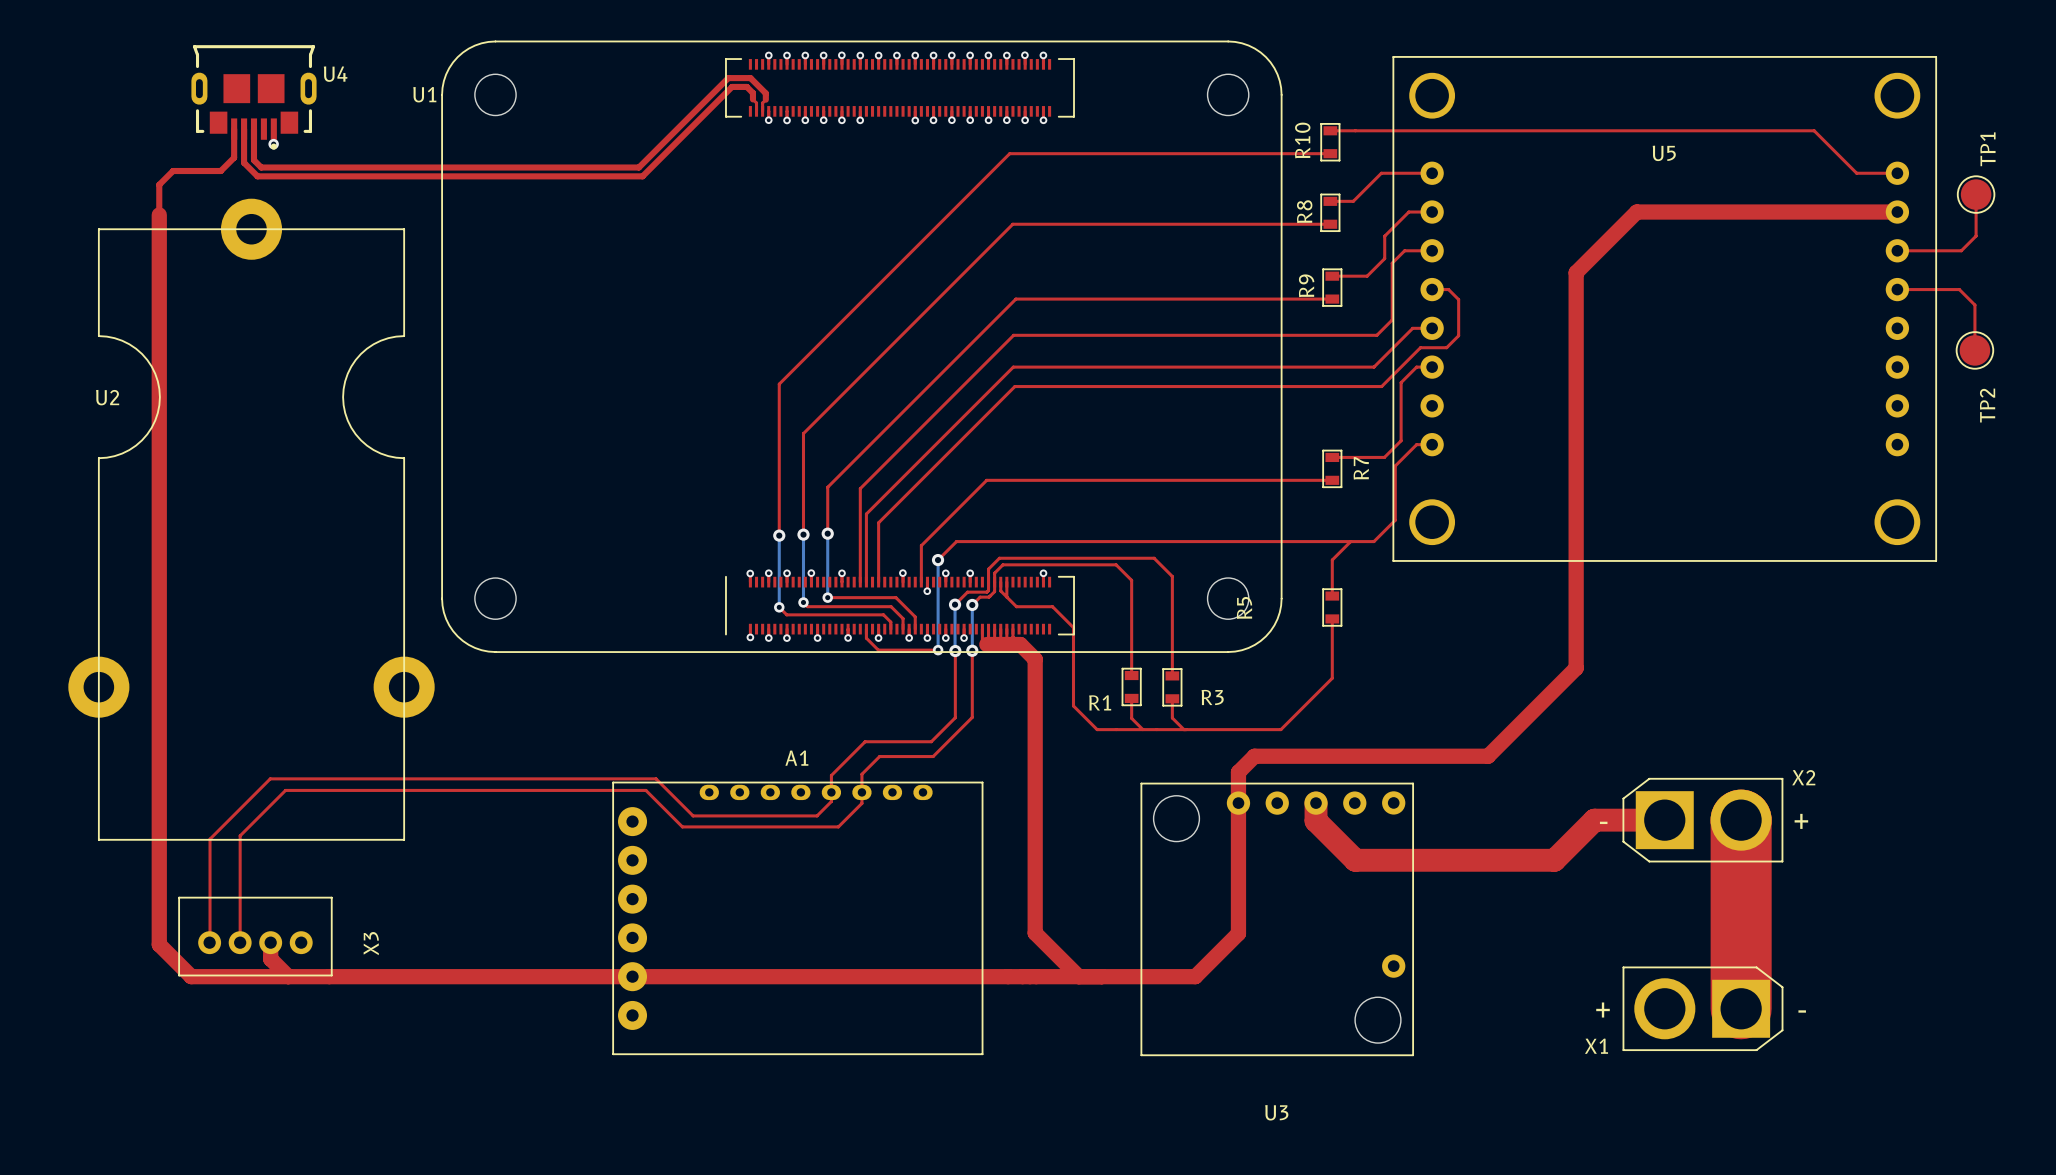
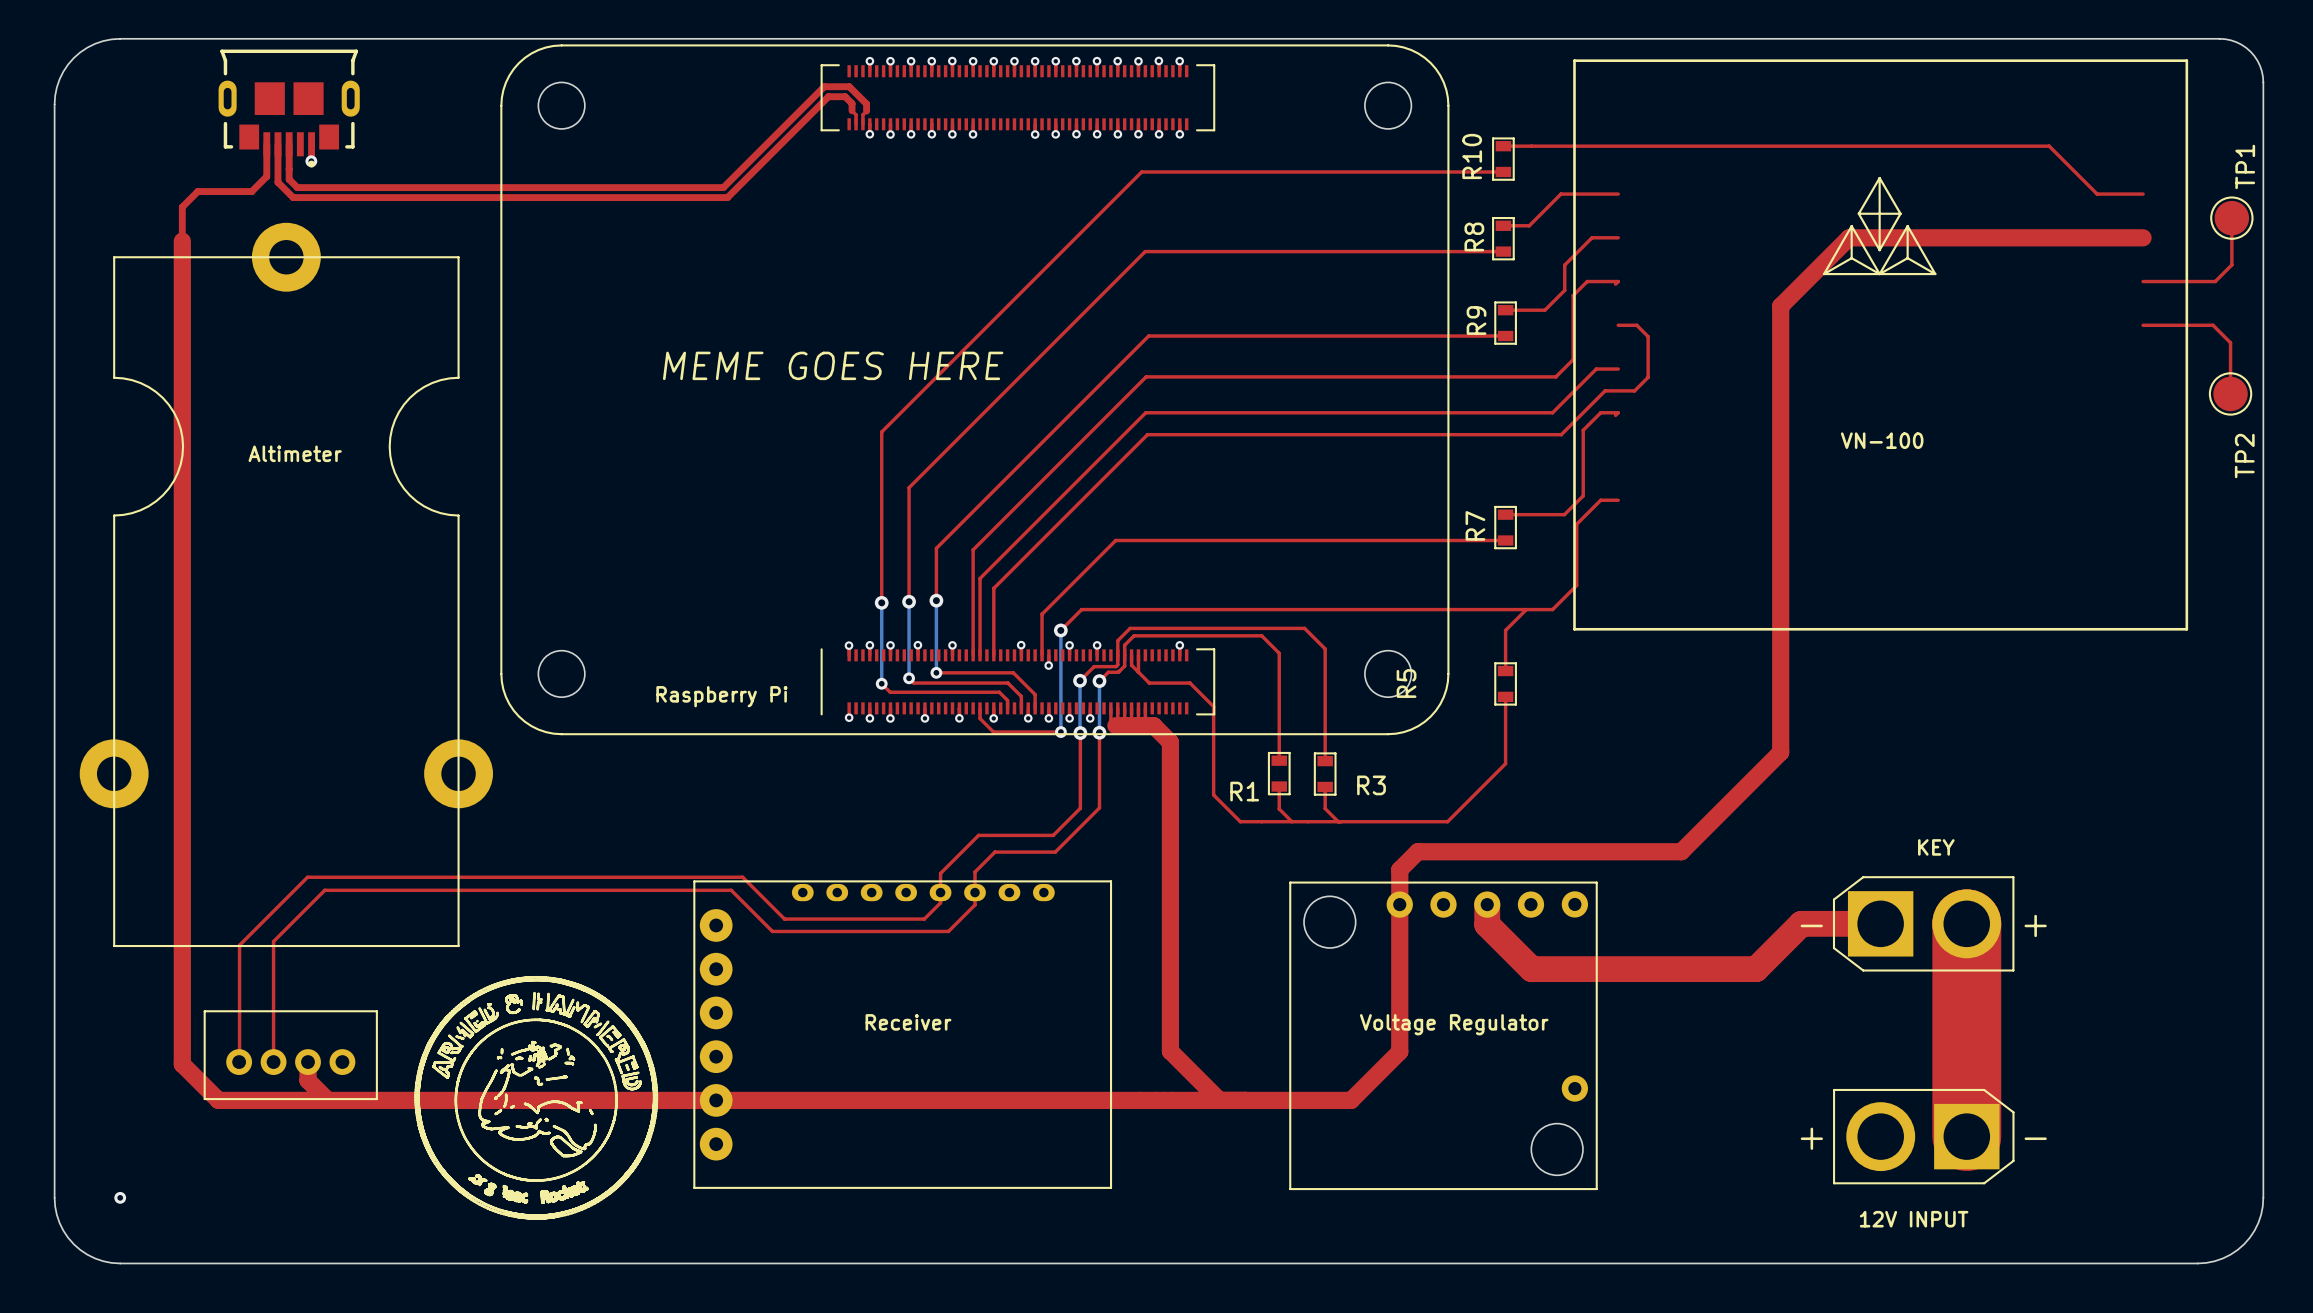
board edge: none -> (120, 38) (2219, 38) (2241, 44) (2257, 60) (2263, 82) (2263, 1197) (2261, 1214) (2254, 1230) (2244, 1244) (2230, 1254) (2214, 1261) (2197, 1263) (120, 1263) (103, 1261) (87, 1254) (73, 1244) (63, 1230) (56, 1214) (54, 1197) (54, 104) (59, 79) (73, 58) (95, 43) (120, 38)
line: none -> (1574, 60) (2186, 60) (2186, 629) (1574, 629) (1574, 60)
U4 name: U4 (335, 74) -> none
U1 name: U1 (424, 94) -> none
line: none -> (1879, 178) (1858, 213)
line: none -> (1879, 178) (1900, 213)
line: none -> (1879, 178) (1879, 250)
line: none -> (1858, 213) (1879, 250)
line: none -> (1858, 213) (1900, 213)
line: none -> (1900, 213) (1879, 250)
line: none -> (1851, 226) (1879, 274)
line: none -> (1851, 226) (1824, 274)
line: none -> (1851, 226) (1851, 258)
line: none -> (1907, 226) (1879, 274)
line: none -> (1907, 226) (1935, 274)
line: none -> (1907, 226) (1907, 258)
line: none -> (1851, 258) (1879, 274)
line: none -> (1851, 258) (1824, 274)
line: none -> (1907, 258) (1935, 274)
line: none -> (1907, 258) (1879, 274)
line: none -> (1824, 274) (1935, 274)
U5: (1664, 308) -> none
text: none -> MEME GOES HERE (833, 365)
text: none -> VN-100 (1882, 440)
U2 name: U2 (107, 397) -> none
text: none -> Altimeter (295, 453)
R7 name position: R7 (1361, 468) -> R7 (1475, 525)
text: none -> Raspberry Pi (721, 696)
text: none -> KEY (1936, 847)
A1 name: A1 (796, 758) -> none
X2 name: X2 (1803, 777) -> none
line: none -> (534, 993) (533, 1009)
line: none -> (538, 993) (538, 998)
line: none -> (548, 993) (547, 1009)
line: none -> (558, 996) (549, 1010)
line: none -> (563, 997) (564, 1013)
line: none -> (573, 999) (566, 1014)
line: none -> (540, 1002) (541, 1002)
line: none -> (577, 1002) (577, 1010)
line: none -> (538, 1002) (537, 1009)
line: none -> (584, 1005) (578, 1010)
line: none -> (574, 1007) (570, 1014)
line: none -> (588, 1007) (581, 1022)
line: none -> (479, 1008) (487, 1023)
line: none -> (490, 1008) (493, 1014)
line: none -> (556, 1008) (559, 1009)
line: none -> (484, 1009) (489, 1017)
line: none -> (550, 1010) (552, 1011)
line: none -> (594, 1011) (584, 1024)
line: none -> (474, 1011) (465, 1018)
line: none -> (475, 1014) (471, 1018)
line: none -> (497, 1014) (495, 1018)
line: none -> (598, 1014) (596, 1022)
line: none -> (594, 1018) (587, 1026)
line: none -> (465, 1018) (475, 1031)
line: none -> (494, 1019) (487, 1023)
line: none -> (532, 1019) (517, 1022) (501, 1027) (476, 1045) (460, 1071) (456, 1086) (455, 1103) (462, 1132) (470, 1145) (481, 1158) (507, 1175) (523, 1179) (539, 1180) (554, 1178) (570, 1172) (595, 1154) (611, 1128) (615, 1113) (616, 1097) (609, 1067) (602, 1054) (591, 1041) (565, 1025) (548, 1020) (532, 1019)
line: none -> (477, 1021) (477, 1021)
line: none -> (608, 1021) (598, 1034)
line: none -> (482, 1022) (477, 1026)
text: none -> Receiver (908, 1022)
line: none -> (460, 1022) (472, 1033)
line: none -> (600, 1023) (594, 1027)
line: none -> (484, 1025) (476, 1031)
text: none -> Voltage Regulator (1454, 1024)
line: none -> (612, 1026) (600, 1037)
line: none -> (613, 1026) (619, 1035)
line: none -> (457, 1027) (460, 1033)
line: none -> (613, 1032) (617, 1036)
line: none -> (449, 1035) (461, 1046)
line: none -> (465, 1036) (462, 1030) (470, 1036)
line: none -> (608, 1036) (612, 1039)
line: none -> (456, 1036) (463, 1038)
line: none -> (600, 1038) (607, 1045)
line: none -> (623, 1039) (609, 1048)
line: none -> (623, 1039) (628, 1046)
line: none -> (534, 1042) (535, 1042)
line: none -> (443, 1044) (439, 1052)
line: none -> (460, 1047) (452, 1048)
line: none -> (460, 1048) (458, 1051)
line: none -> (559, 1047) (557, 1049)
line: none -> (502, 1049) (501, 1053)
line: none -> (567, 1048) (568, 1054)
line: none -> (522, 1050) (512, 1054)
line: none -> (444, 1051) (446, 1052)
line: none -> (457, 1052) (451, 1052)
line: none -> (438, 1052) (453, 1060)
line: none -> (538, 1053) (538, 1054)
line: none -> (620, 1053) (617, 1061)
line: none -> (534, 1055) (533, 1060)
line: none -> (545, 1055) (546, 1059)
line: none -> (555, 1055) (549, 1058)
line: none -> (538, 1055) (538, 1061)
line: none -> (632, 1056) (617, 1062)
line: none -> (633, 1057) (637, 1066)
line: none -> (454, 1058) (453, 1060)
line: none -> (529, 1058) (529, 1060)
X3 name: X3 (371, 943) -> none
line: none -> (435, 1062) (452, 1062)
line: none -> (565, 1063) (569, 1063)
line: none -> (617, 1062) (621, 1073)
line: none -> (632, 1062) (634, 1068)
line: none -> (544, 1064) (543, 1064)
line: none -> (626, 1065) (628, 1069)
line: none -> (507, 1066) (503, 1069)
line: none -> (542, 1065) (539, 1067)
line: none -> (434, 1066) (447, 1077)
line: none -> (439, 1067) (443, 1069)
line: none -> (528, 1068) (530, 1068)
line: none -> (531, 1069) (520, 1075)
line: none -> (509, 1071) (505, 1086)
line: none -> (514, 1072) (519, 1075)
line: none -> (495, 1072) (482, 1098)
line: none -> (638, 1072) (623, 1076)
line: none -> (565, 1076) (548, 1079)
line: none -> (623, 1077) (623, 1081)
line: none -> (636, 1077) (627, 1079)
line: none -> (635, 1083) (629, 1084)
line: none -> (419, 1087) (423, 1065) (431, 1044) (444, 1024) (459, 1008) (479, 994) (500, 985) (522, 980) (545, 980) (567, 984) (589, 992) (607, 1004) (624, 1019) (638, 1039) (646, 1057) (652, 1078) (654, 1103)
line: none -> (627, 1087) (635, 1088)
line: none -> (502, 1091) (498, 1095)
line: none -> (418, 1092) (419, 1113)
line: none -> (506, 1094) (504, 1106)
line: none -> (481, 1101) (479, 1114) (481, 1119)
line: none -> (558, 1102) (549, 1102) (539, 1106)
line: none -> (578, 1104) (578, 1105)
line: none -> (531, 1107) (537, 1113)
line: none -> (578, 1107) (578, 1109)
line: none -> (571, 1108) (578, 1111)
line: none -> (653, 1108) (644, 1143) (626, 1173)
line: none -> (501, 1110) (495, 1114)
line: none -> (420, 1118) (430, 1148) (448, 1176) (474, 1197) (503, 1210) (536, 1215) (570, 1210) (598, 1197) (623, 1177)
line: none -> (540, 1119) (537, 1123)
line: none -> (487, 1121) (488, 1121)
line: none -> (516, 1126) (523, 1127)
line: none -> (532, 1126) (525, 1127)
line: none -> (532, 1126) (535, 1127)
line: none -> (553, 1126) (562, 1130)
line: none -> (507, 1127) (492, 1129)
line: none -> (594, 1132) (591, 1142)
line: none -> (501, 1134) (512, 1138)
line: none -> (567, 1135) (571, 1141)
line: none -> (533, 1136) (516, 1139)
line: none -> (560, 1137) (573, 1148)
line: none -> (574, 1144) (582, 1148)
line: none -> (555, 1148) (562, 1155)
line: none -> (563, 1155) (569, 1155)
line: none -> (631, 1172) (644, 1151) (652, 1130) (656, 1106) (655, 1081) (650, 1060) (641, 1038) (627, 1018) (609, 1002) (588, 988) (565, 981) (542, 977) (520, 978) (497, 983) (476, 993) (456, 1007) (440, 1024) (428, 1043) (419, 1066) (415, 1089) (416, 1112) (422, 1136) (431, 1157) (444, 1176) (461, 1192) (482, 1205) (503, 1213) (528, 1218) (550, 1217) (572, 1213) (594, 1203) (613, 1190) (630, 1173)
line: none -> (483, 1179) (479, 1185)
X1 name: X1 (1596, 1046) -> none
line: none -> (582, 1183) (586, 1189)
line: none -> (579, 1187) (580, 1189)
line: none -> (563, 1188) (566, 1197)
line: none -> (576, 1190) (573, 1191)
line: none -> (541, 1192) (542, 1202)
line: none -> (567, 1194) (570, 1196)
line: none -> (509, 1195) (511, 1195)
line: none -> (557, 1195) (557, 1197)
line: none -> (520, 1195) (519, 1200)
via: none -> (120, 1197)
text: none -> 12V INPUT (1914, 1219)
U3 name: U3 (1276, 1112) -> none

